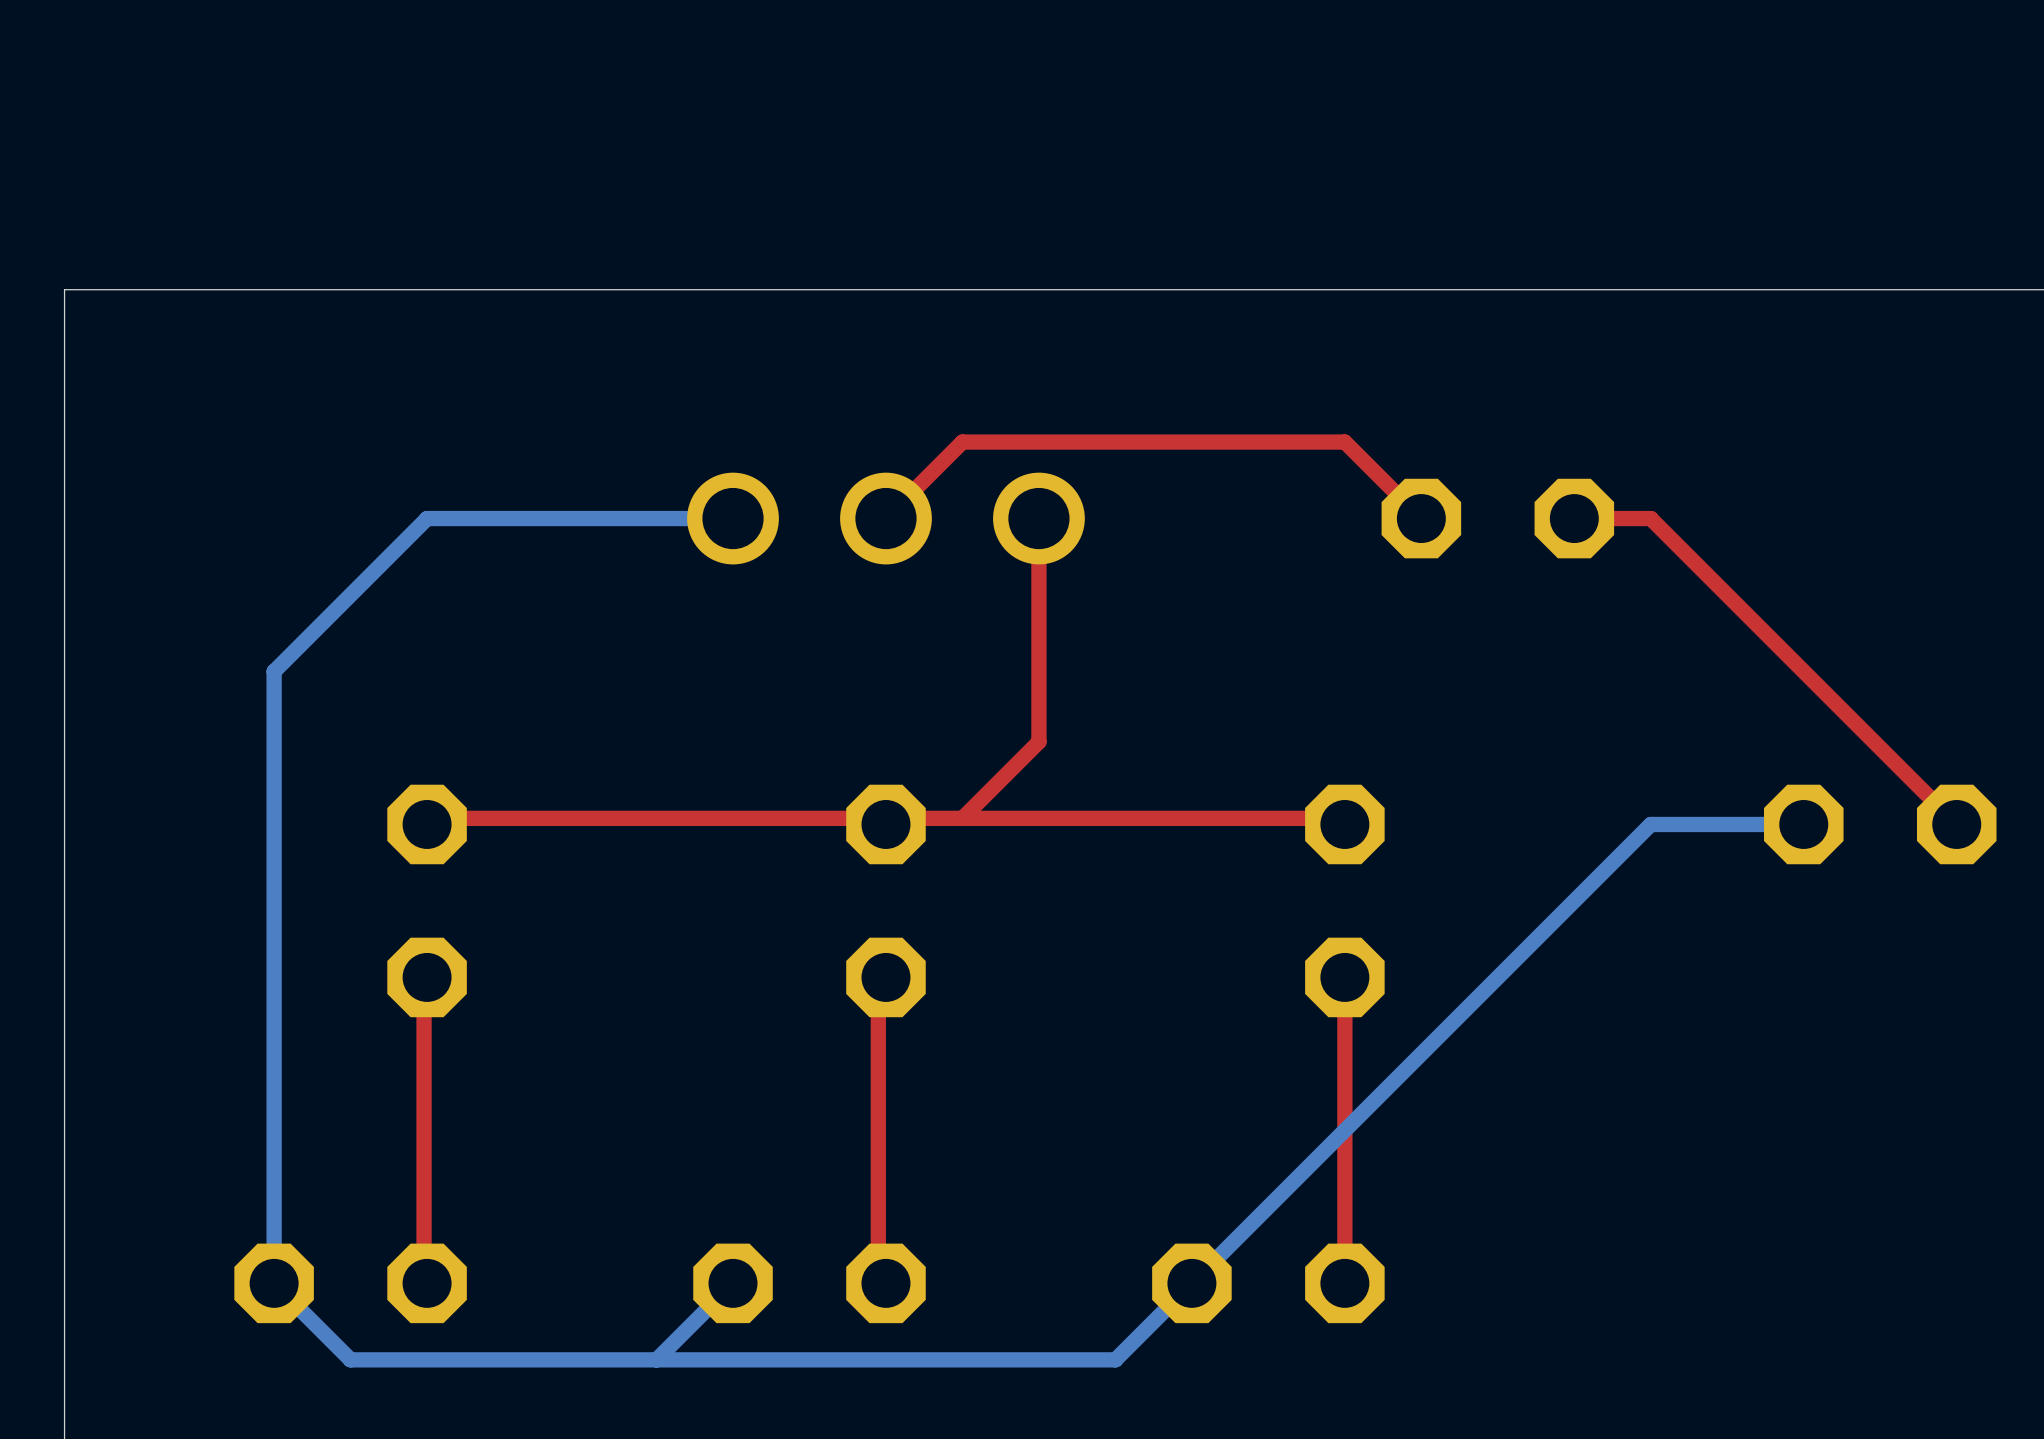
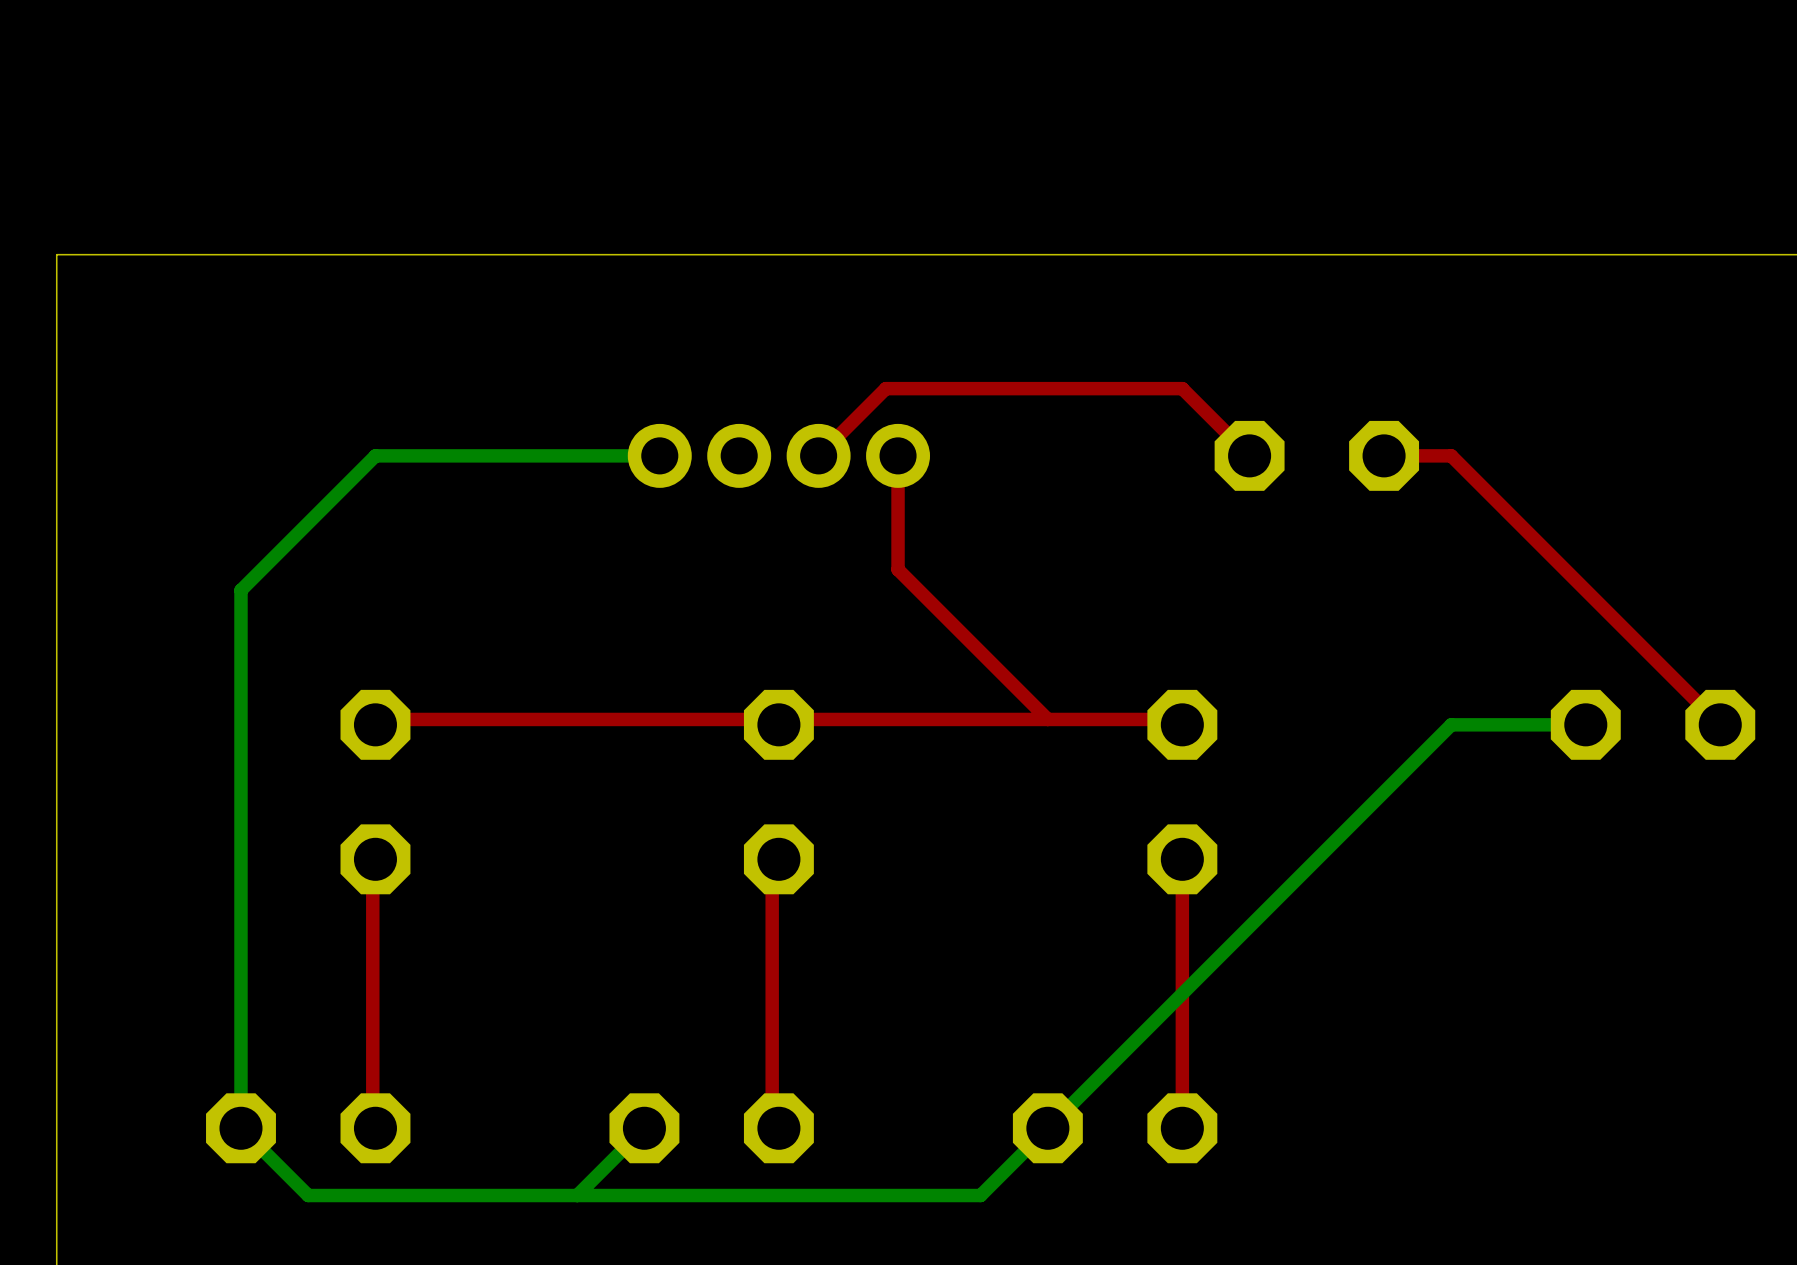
top track: (1007, 442) (962, 442) (885, 518) -> (885, 388) (818, 455)
part footprint: [687, 472, 1085, 565] -> [627, 423, 931, 488]
top track: none -> (898, 455) (898, 569) (1047, 719)
top track: (1038, 518) (1038, 741) (962, 818) -> none

